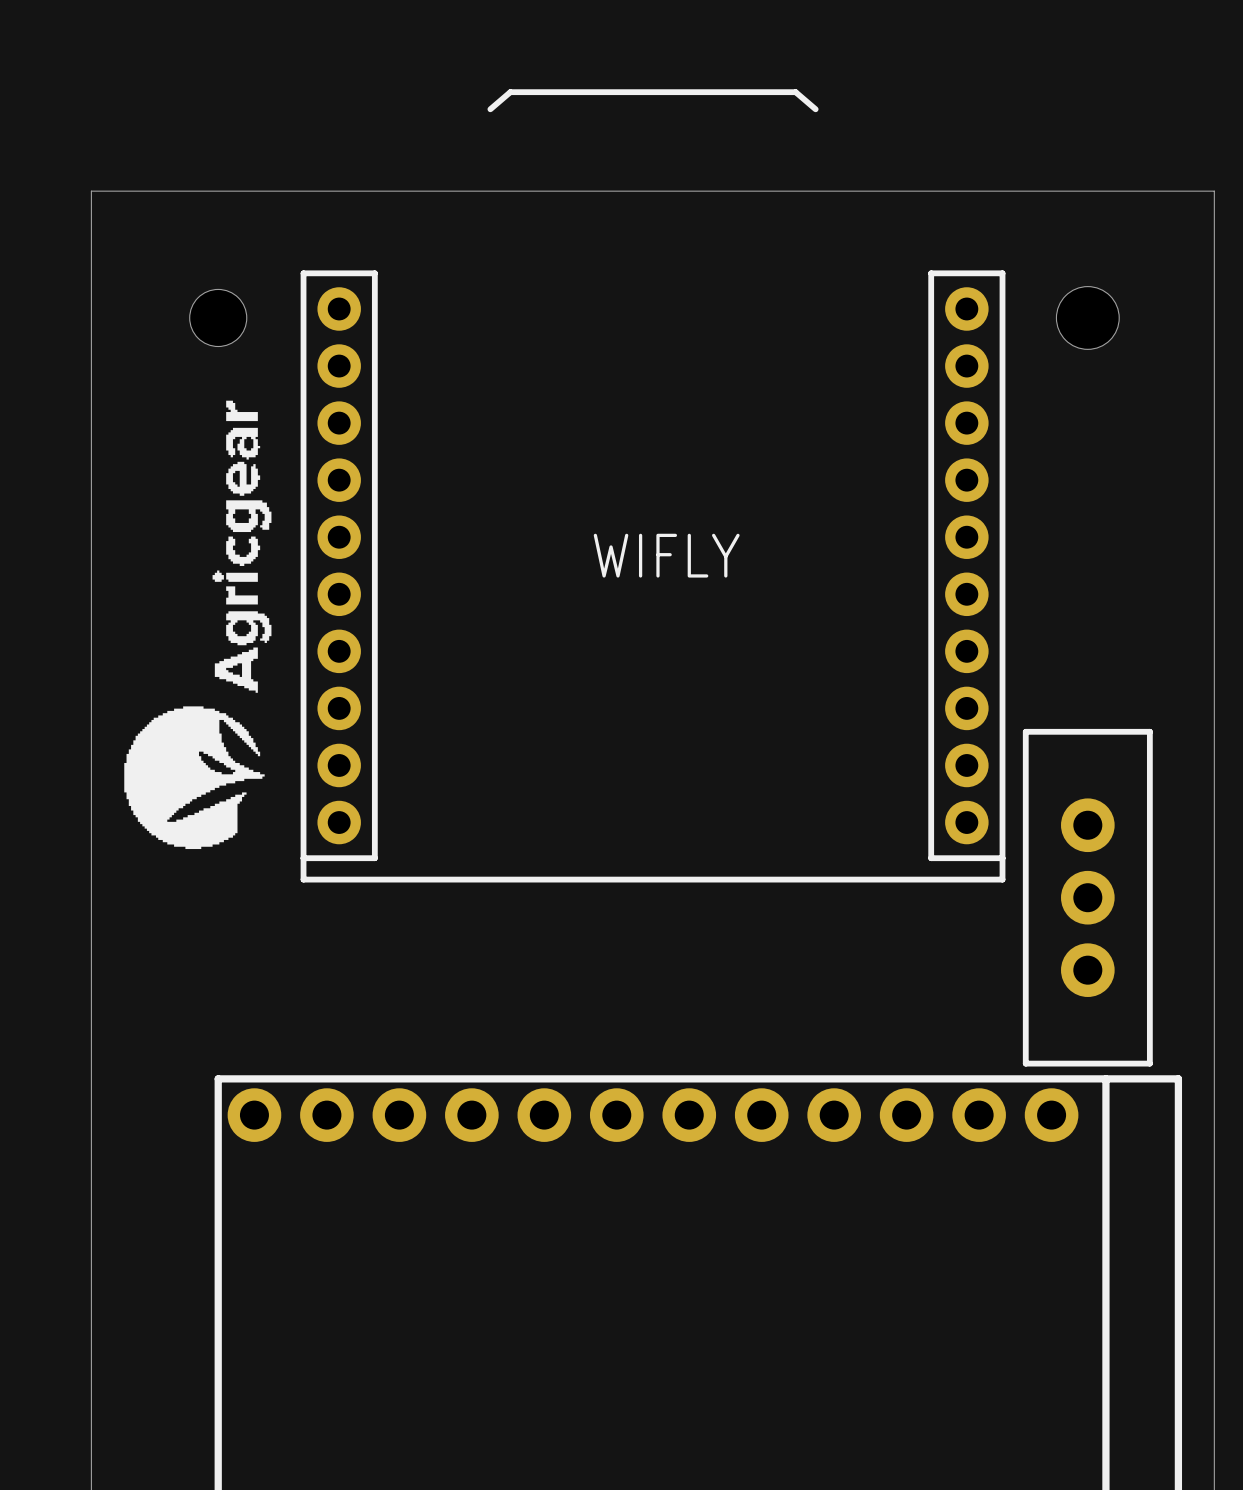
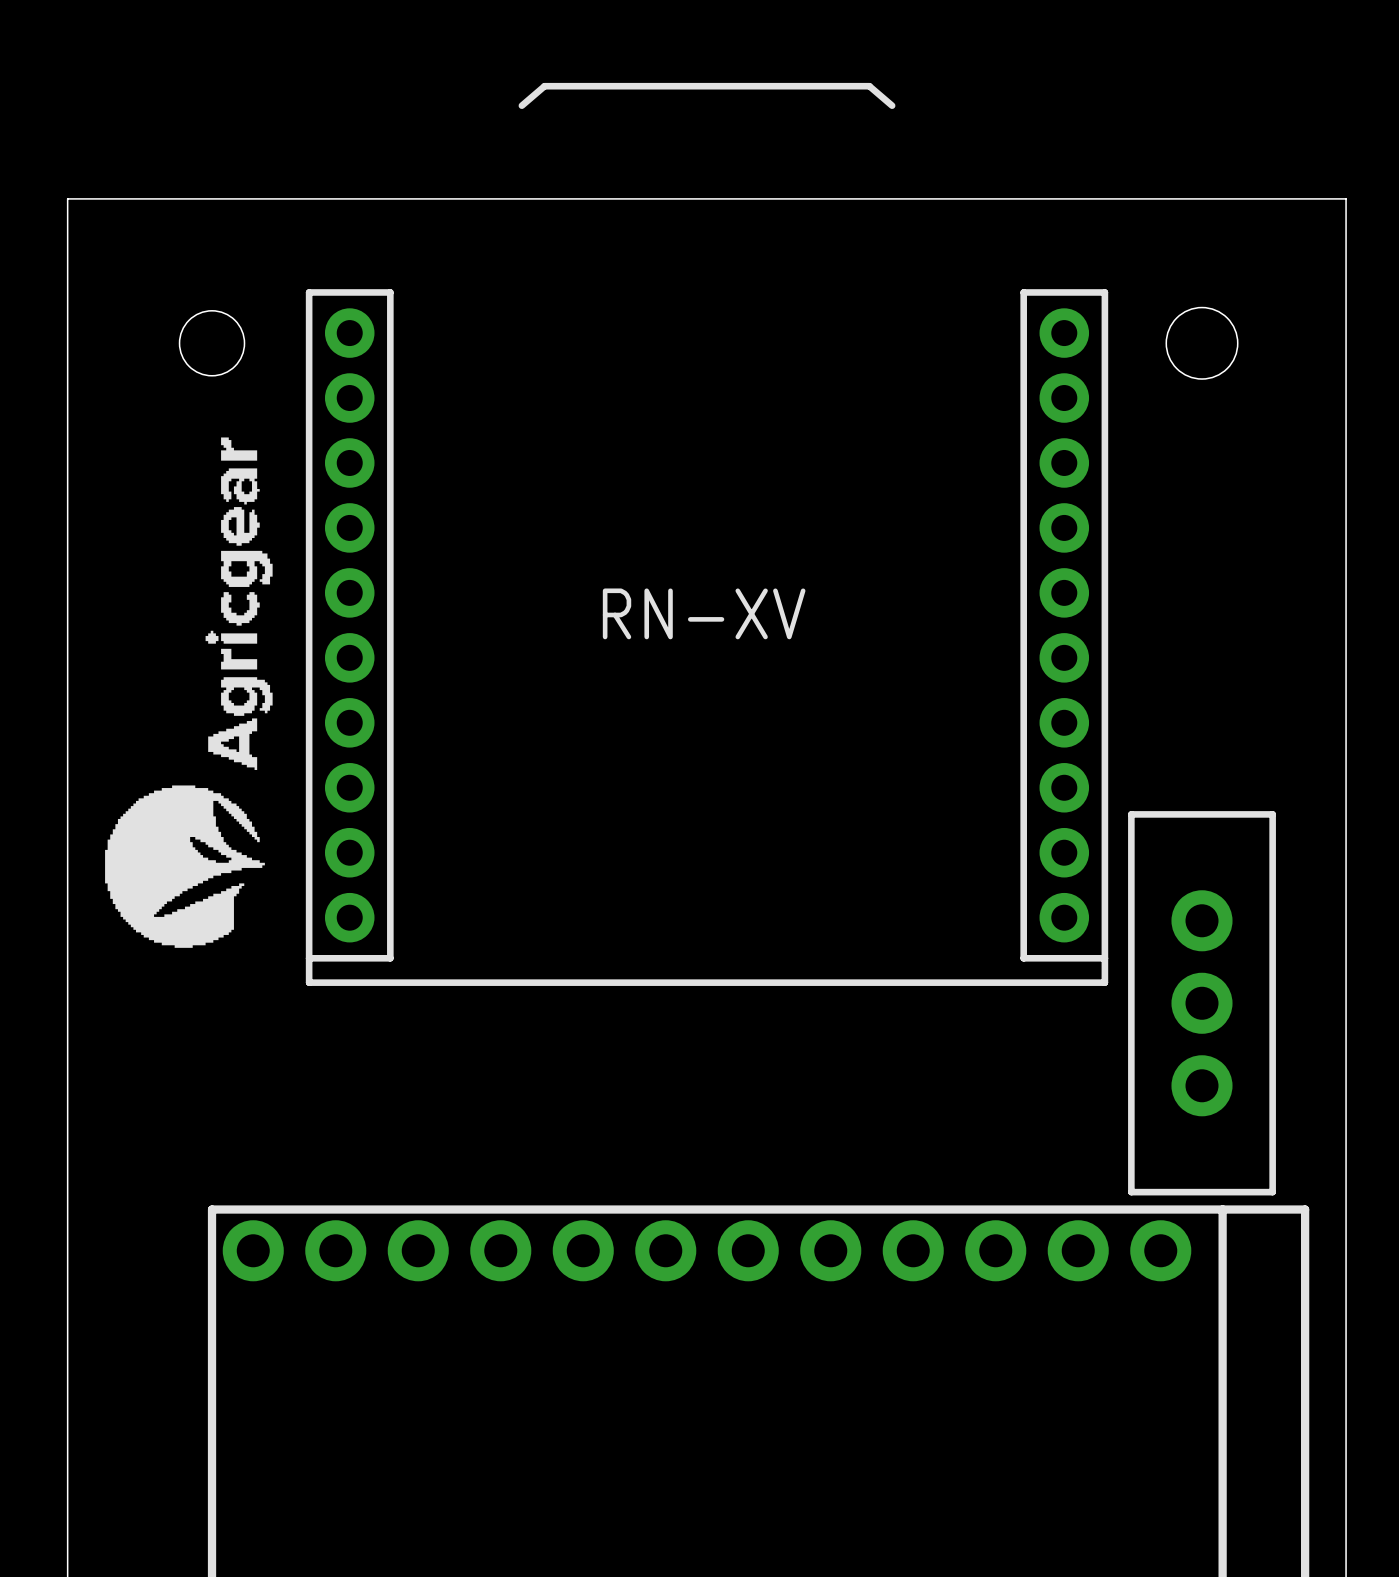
WIFLY name: WIFLY (666, 555) -> RN-XV (704, 613)

